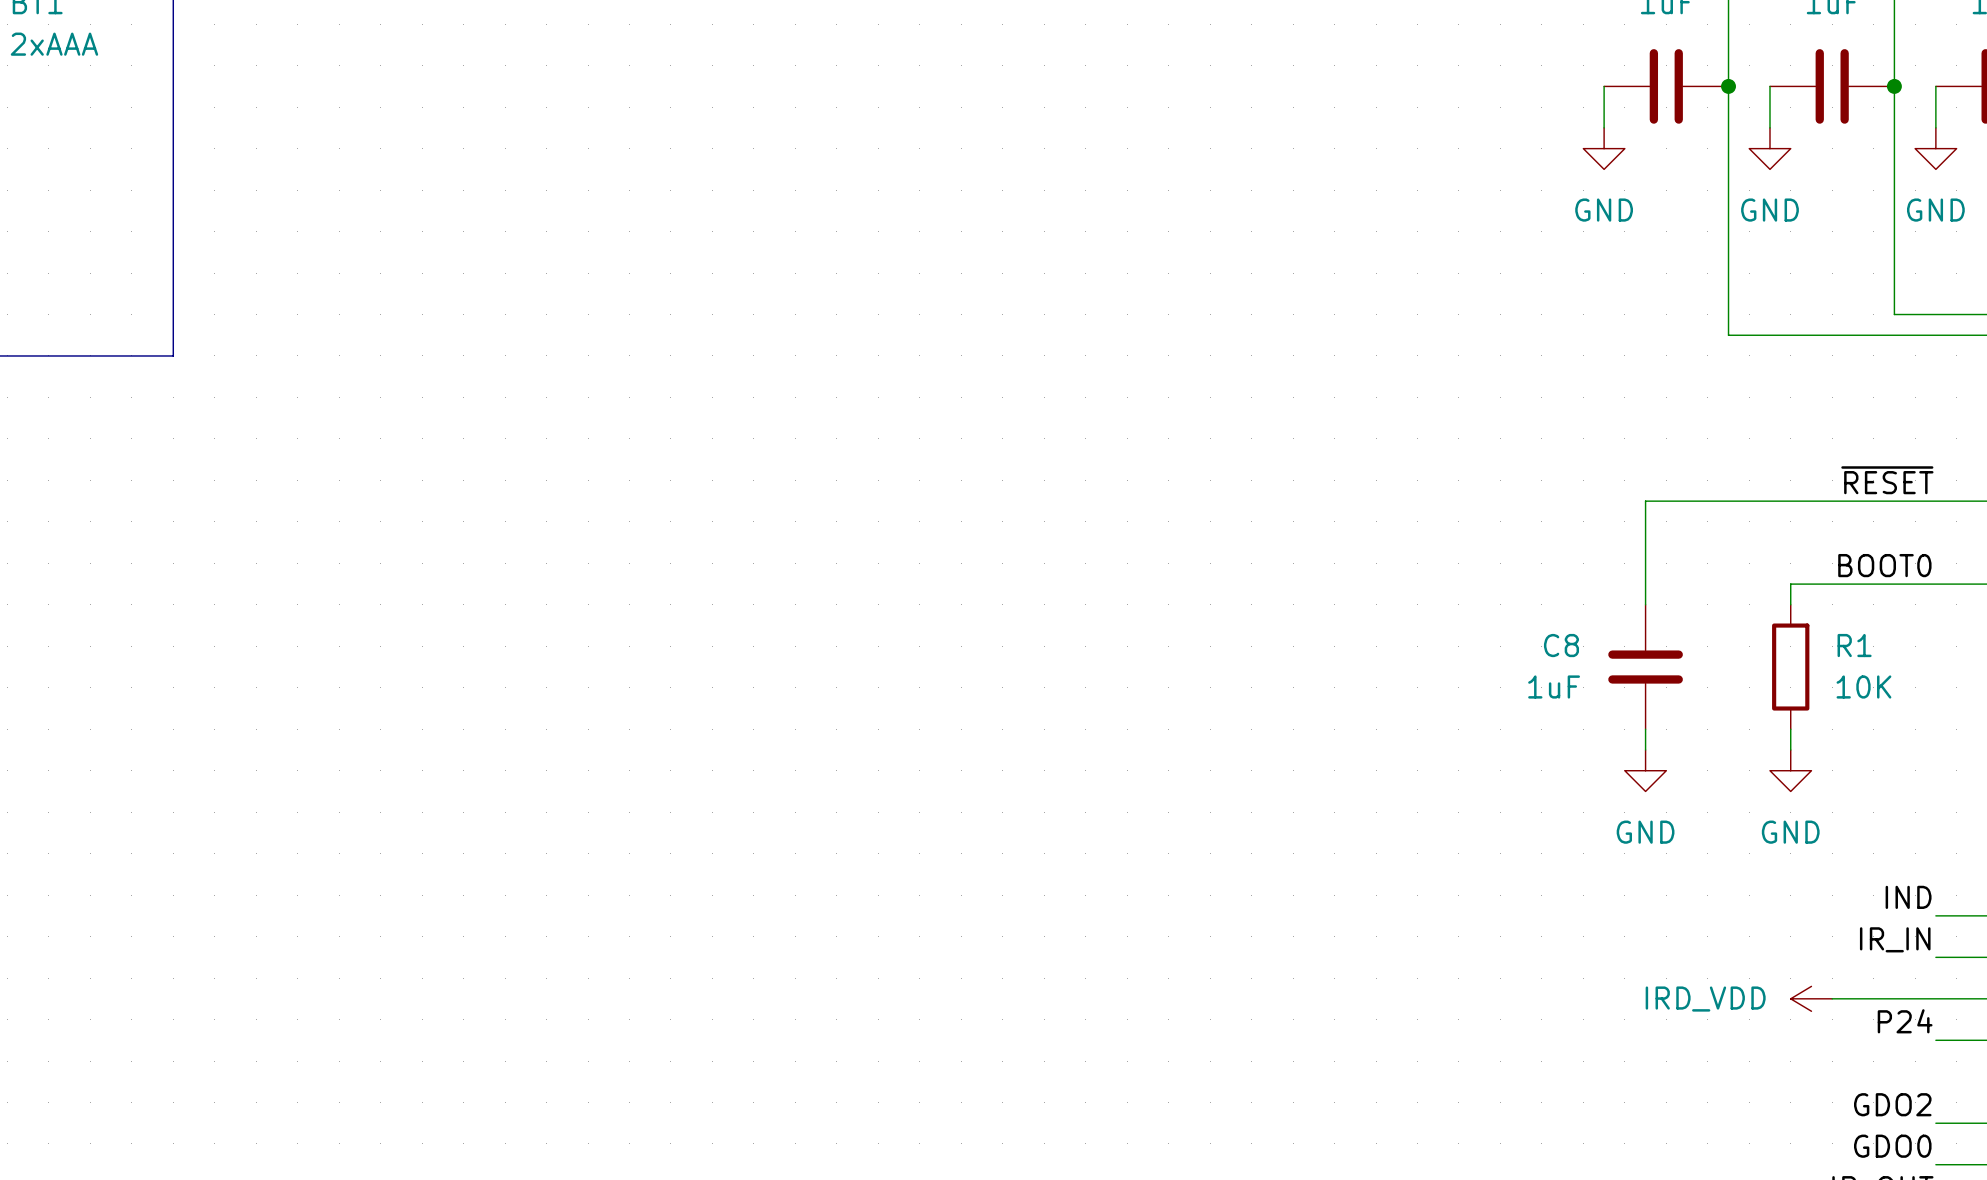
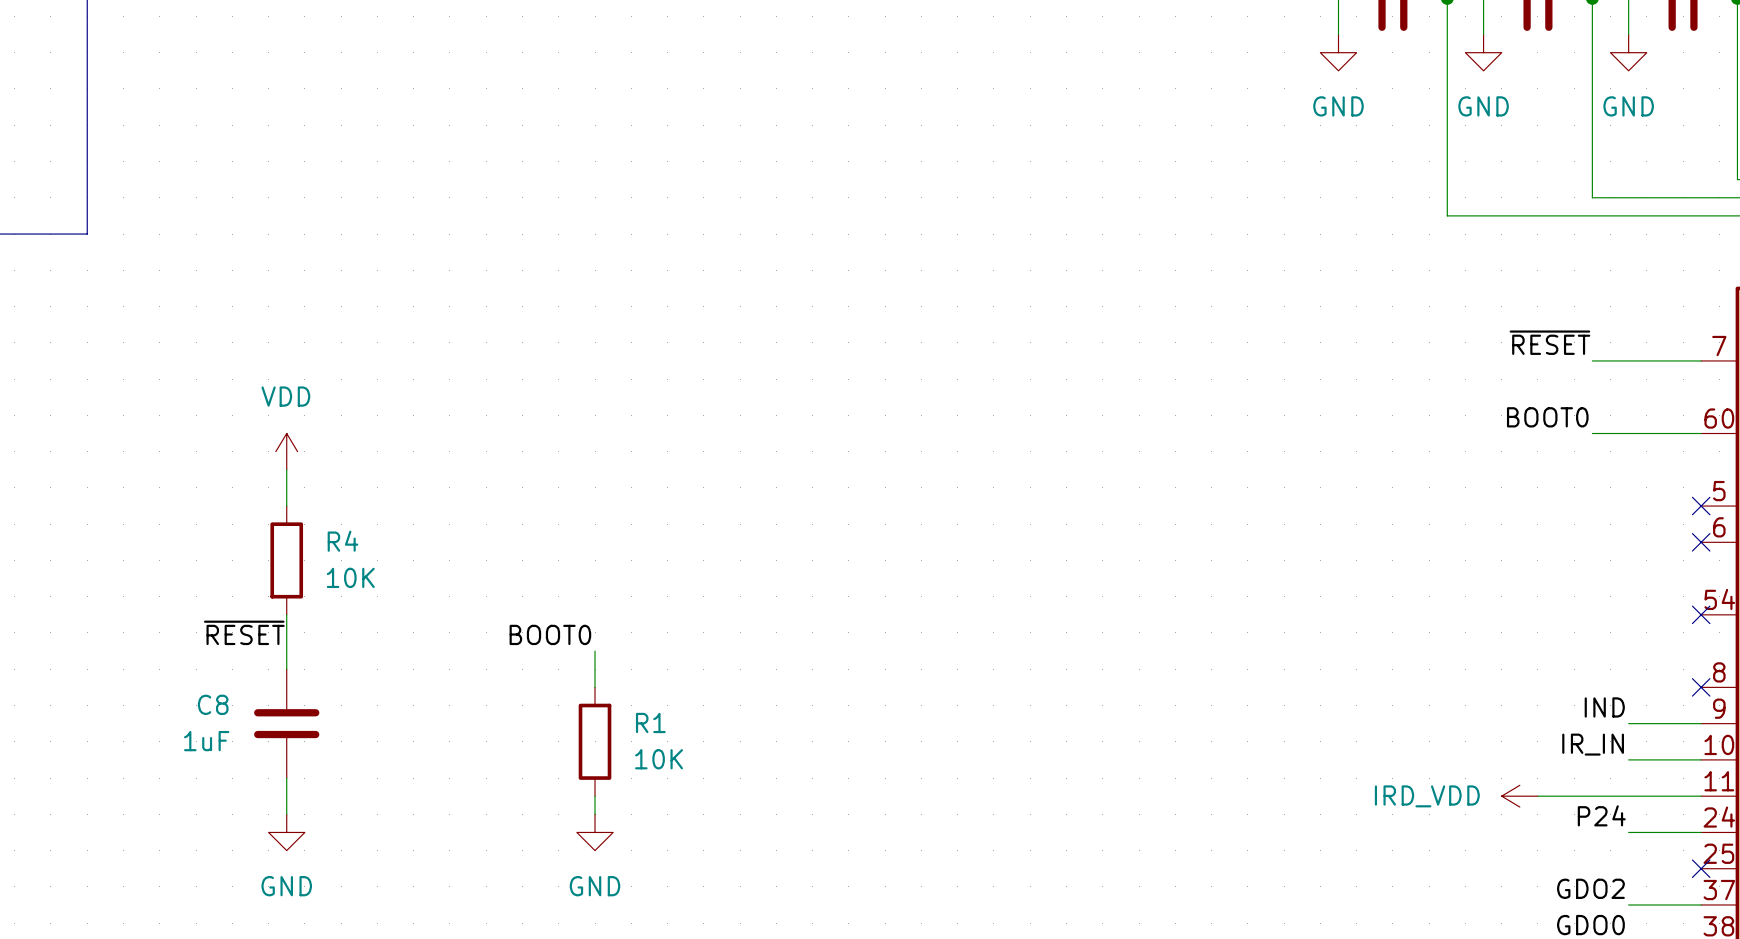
label position: ~{RESET} (1887, 480) -> ~{RESET} (1549, 342)
wire: (1894, 501) (1645, 501) (1645, 604) -> none
label position: BOOT0 (1884, 565) -> BOOT0 (1547, 417)
wire: (1894, 584) (1790, 584) (1790, 604) -> none
power symbol: none -> VDD (286, 451)
wire: none -> (286, 469) (286, 506)
C8 position: (1645, 667) -> (286, 723)
R1 position: (1790, 667) -> (595, 741)
R4: none -> 10K (286, 560)
wire: (1645, 729) (1645, 749) -> none
wire: (1790, 729) (1790, 749) -> none
power symbol: GND (1645, 770) -> none
power symbol: GND (1790, 770) -> none
wire: none -> (286, 614) (286, 669)
label: none -> ~{RESET} (244, 632)
label: none -> BOOT0 (550, 634)
wire: none -> (595, 651) (595, 687)
wire: none -> (286, 778) (286, 814)
wire: none -> (595, 796) (595, 814)
power symbol: none -> GND (286, 832)
power symbol: none -> GND (595, 832)

